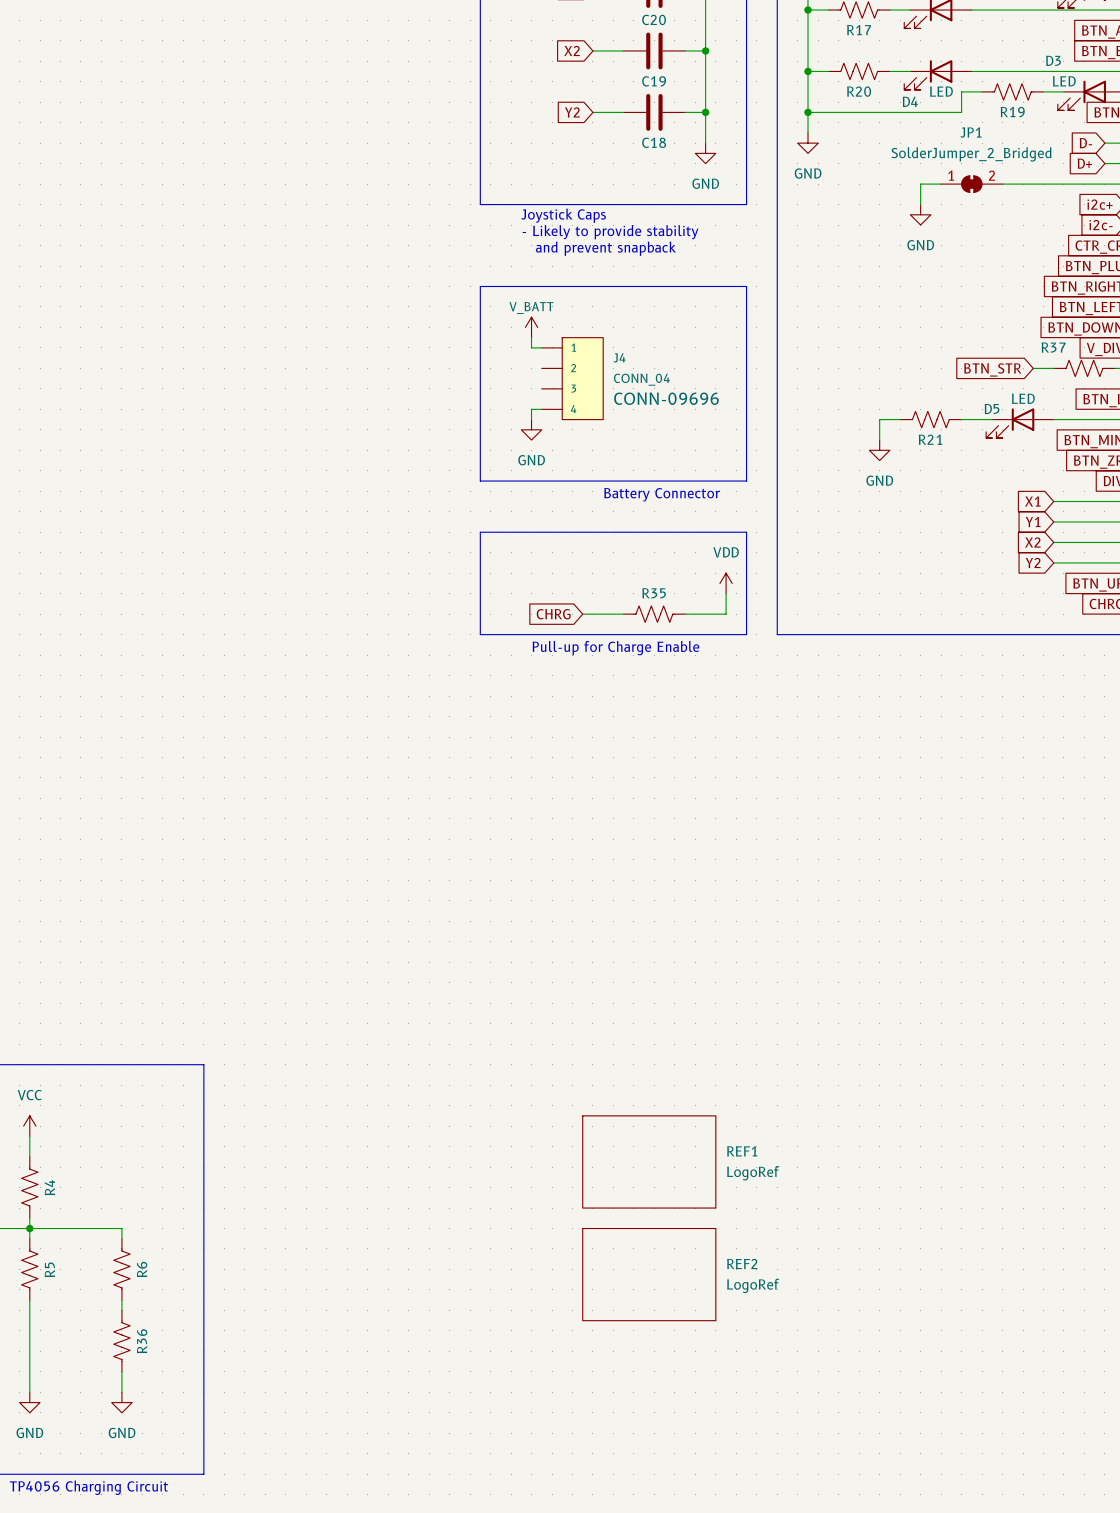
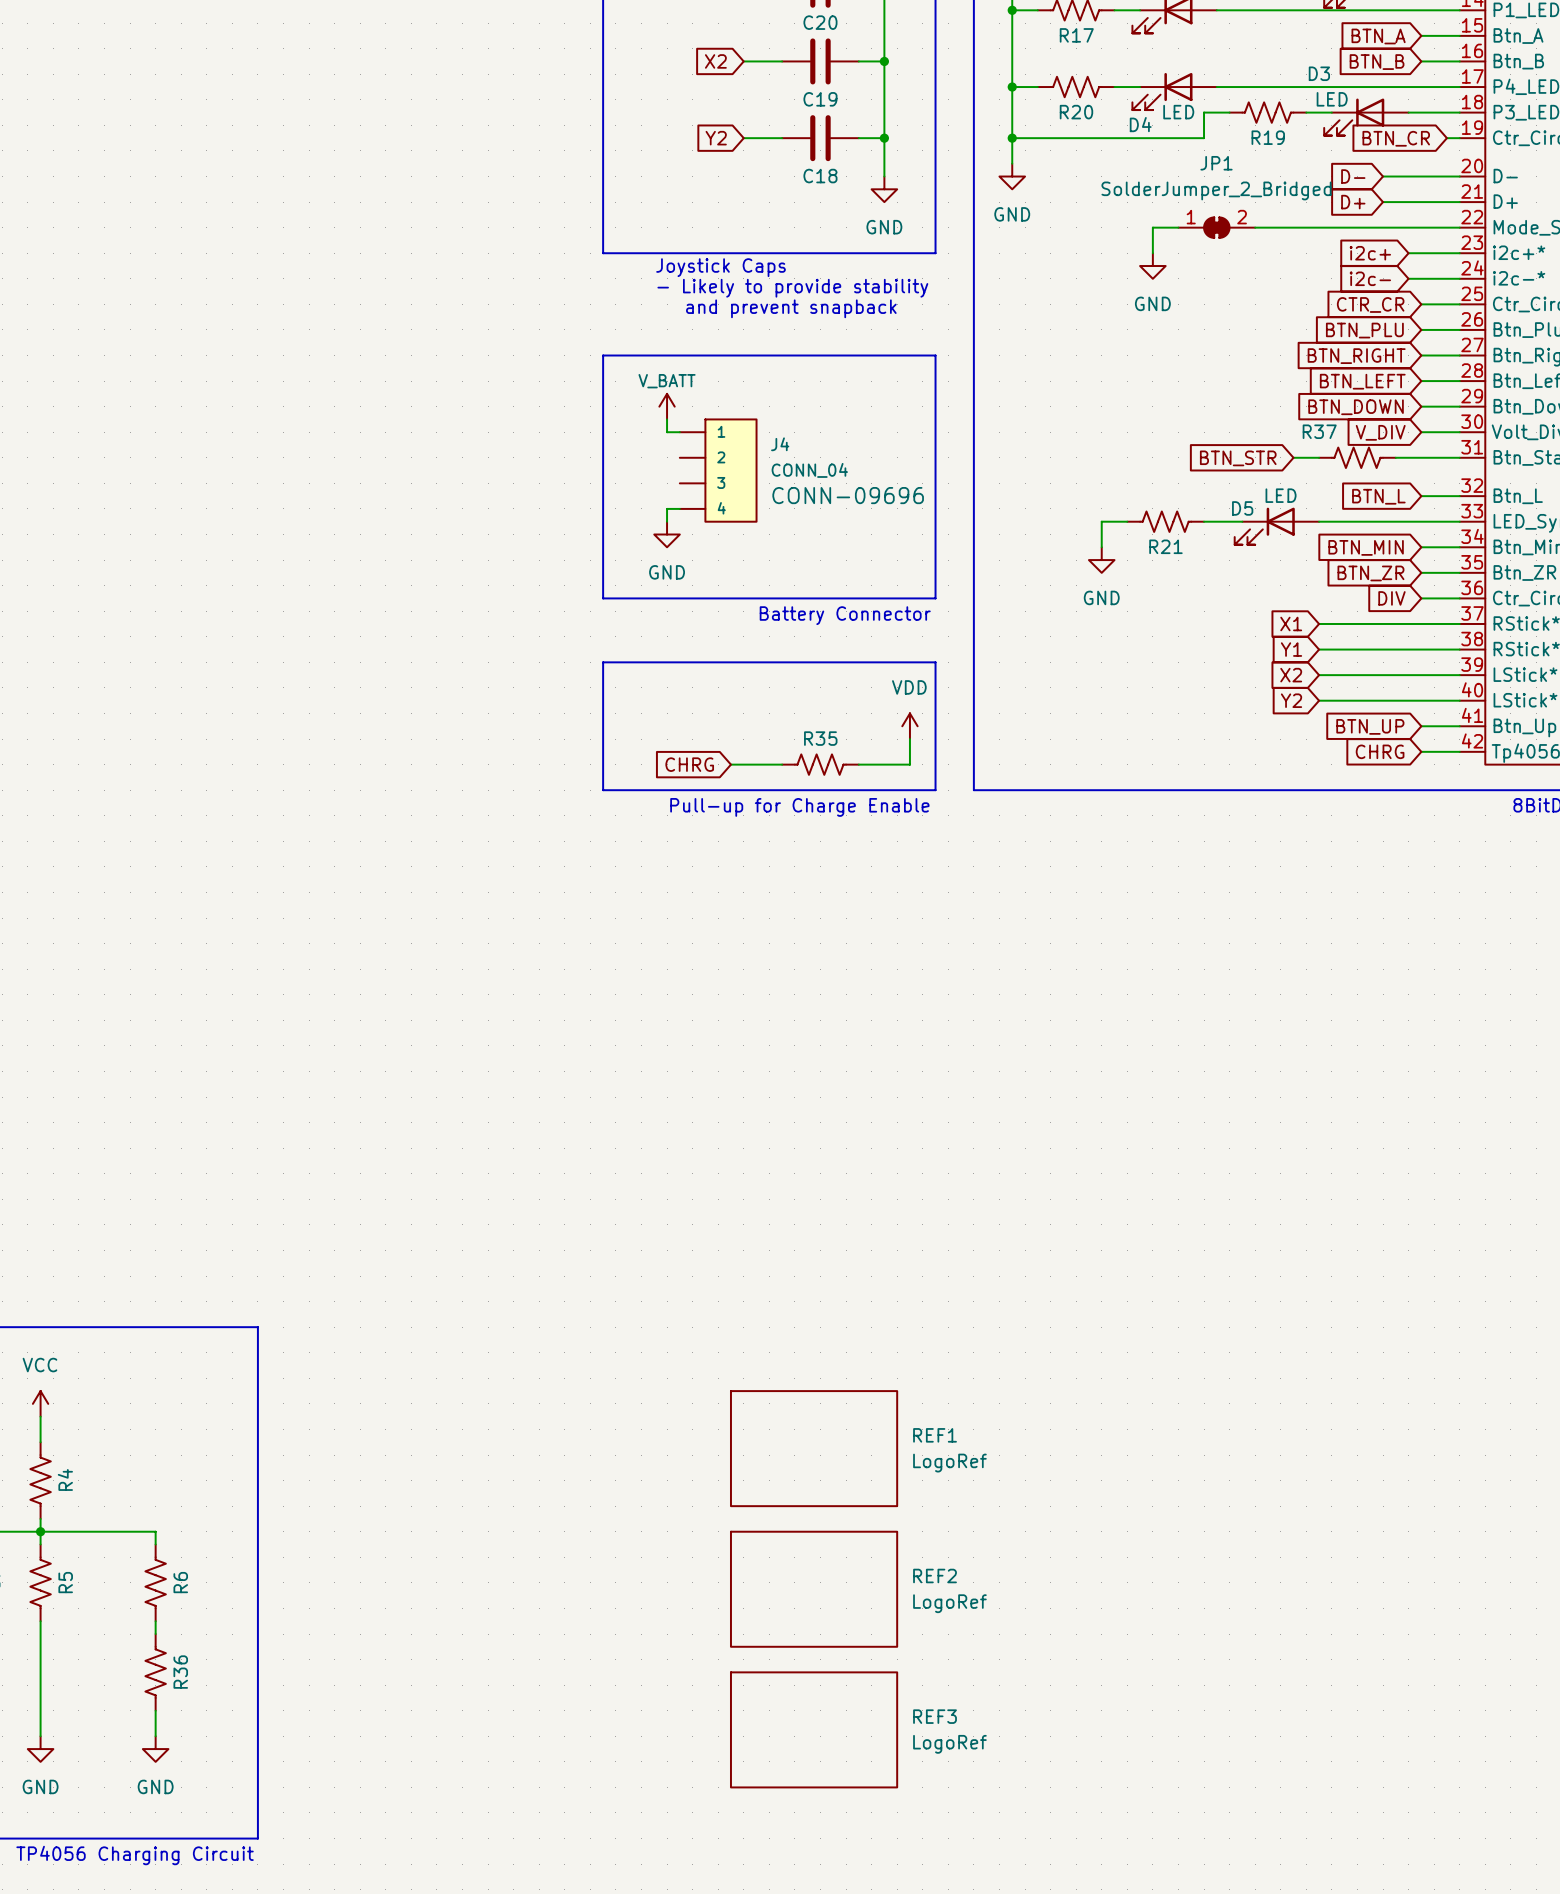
REF3: none -> LogoRef (814, 1729)

